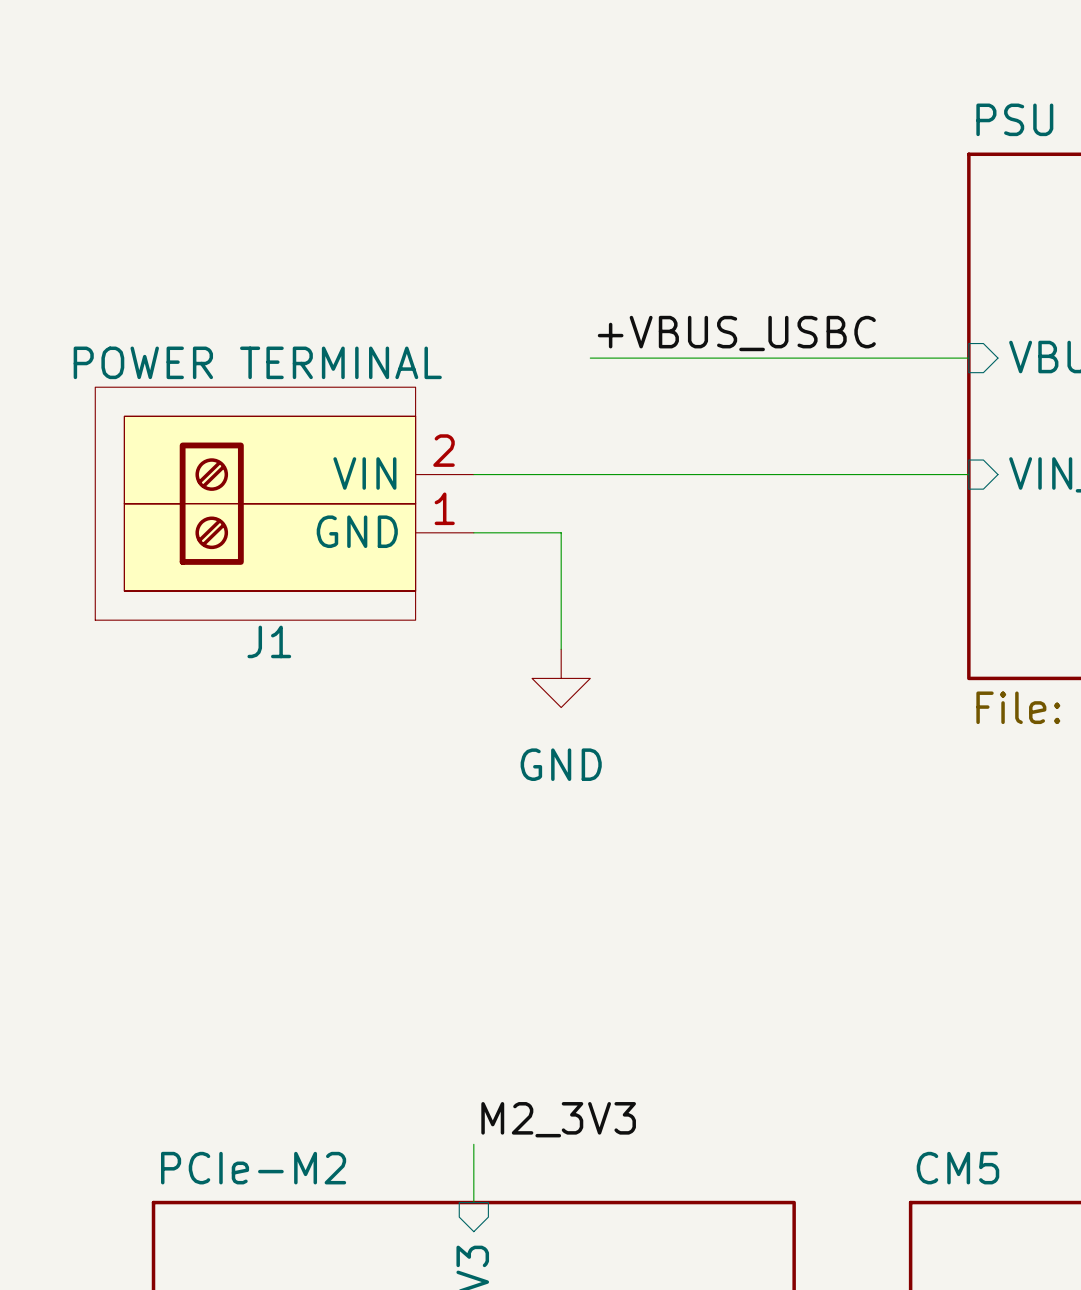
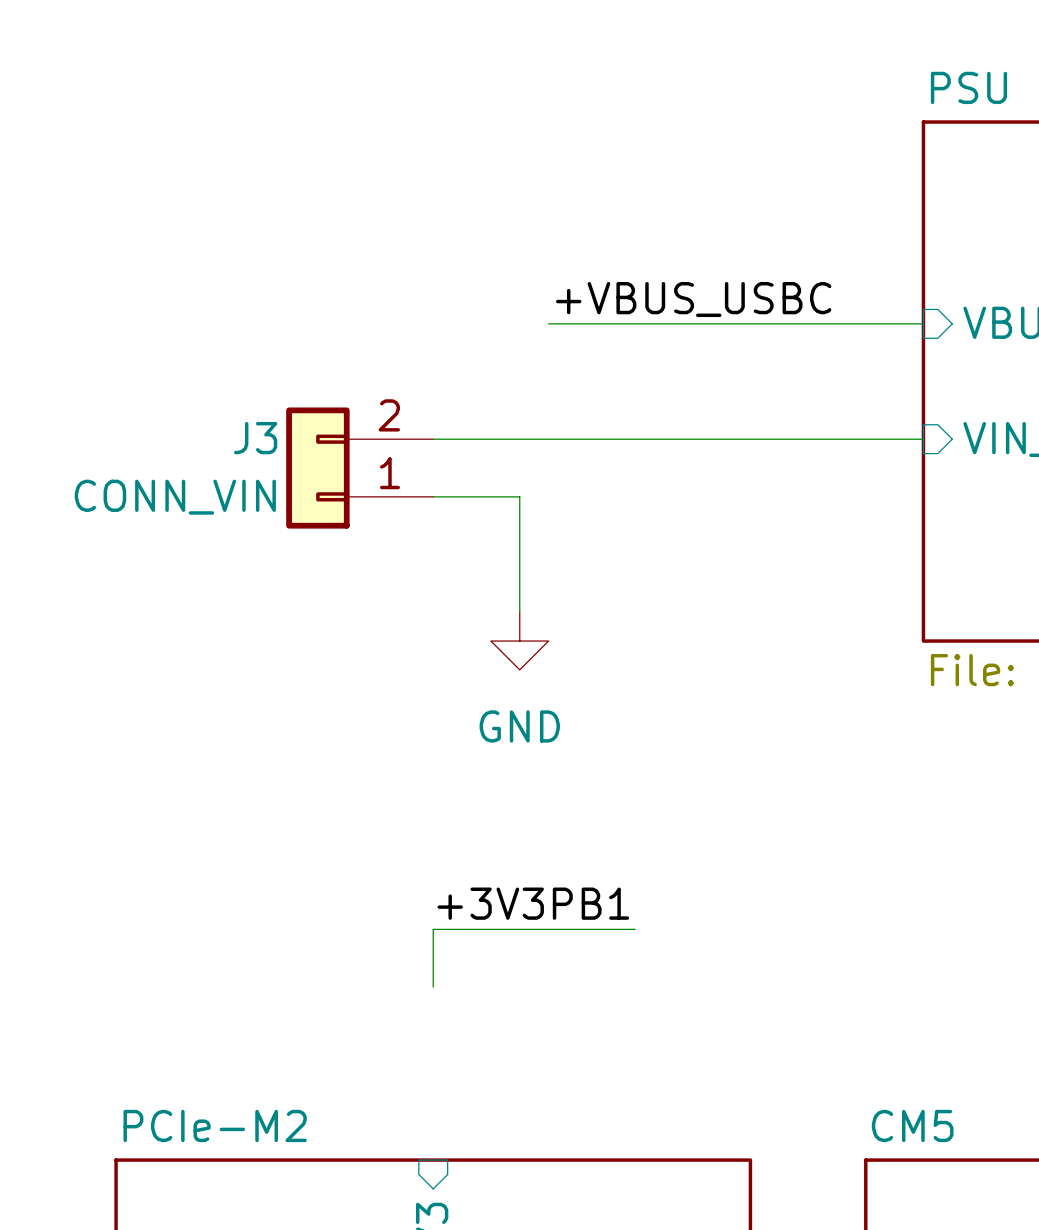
J1: POWER TERMINAL (284, 503) -> none
J3: none -> CONN_VIN (359, 468)
label: none -> +3V3PB1 (533, 903)
wire: none -> (635, 929) (433, 929) (433, 987)
label: M2_3V3 (558, 1119) -> none
wire: (473, 1144) (473, 1202) -> none

